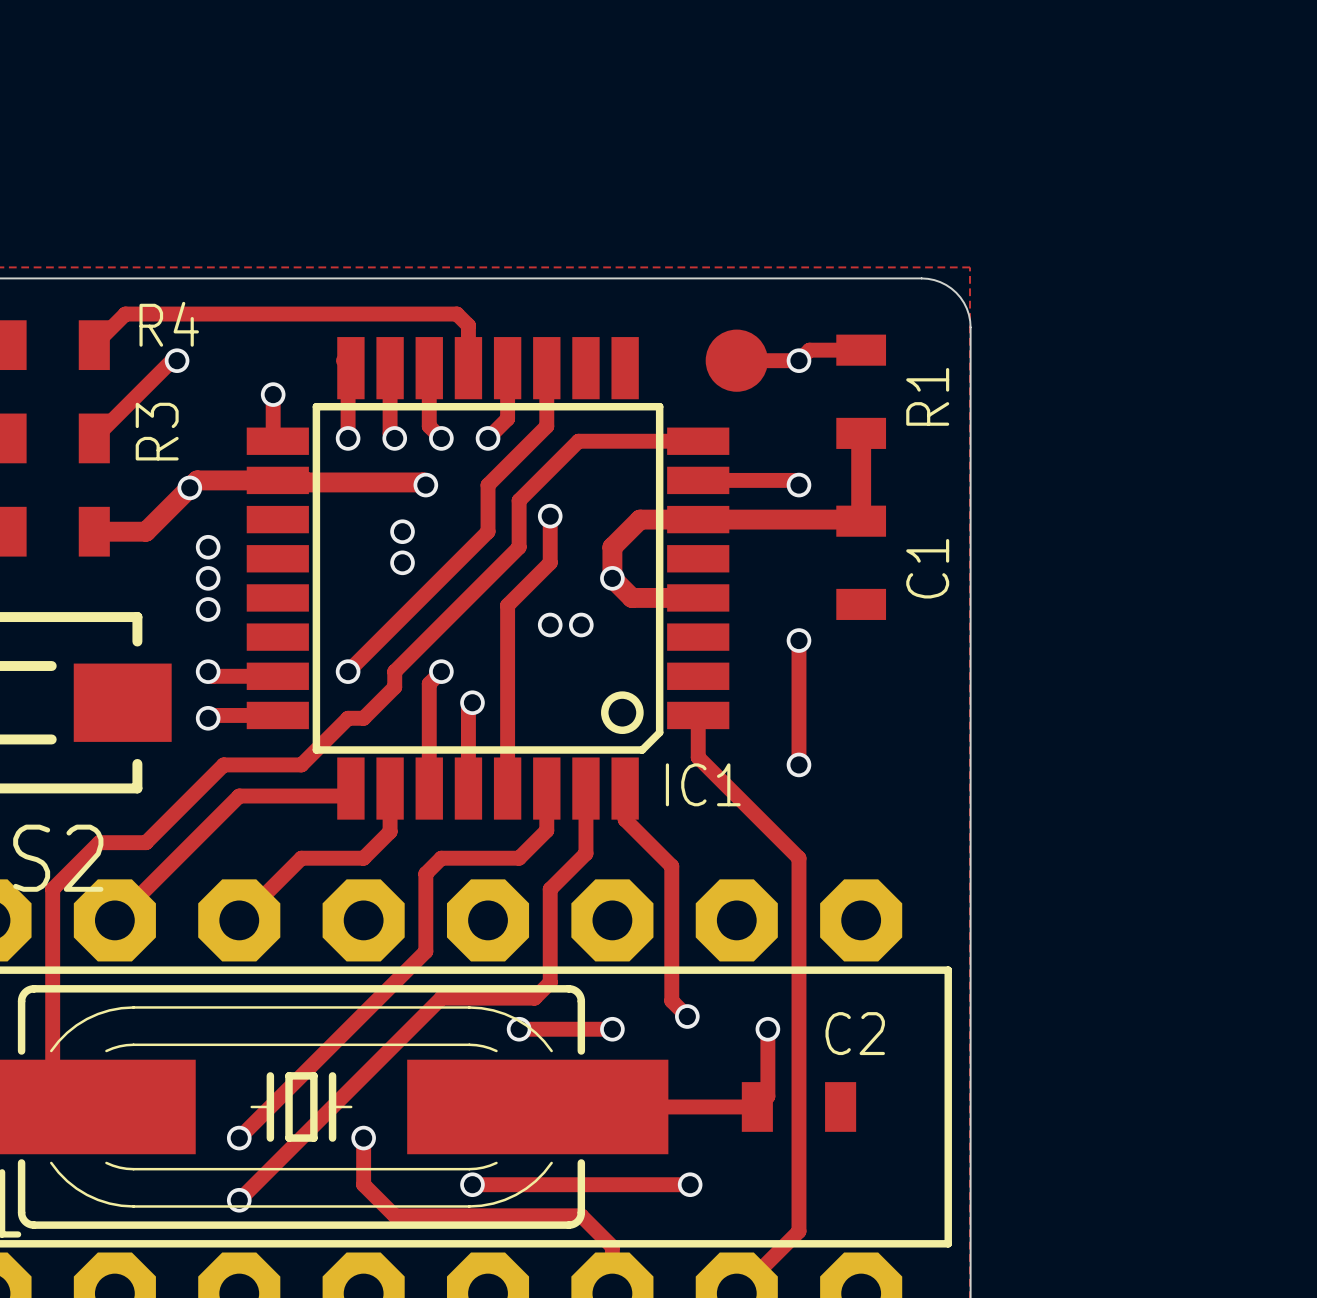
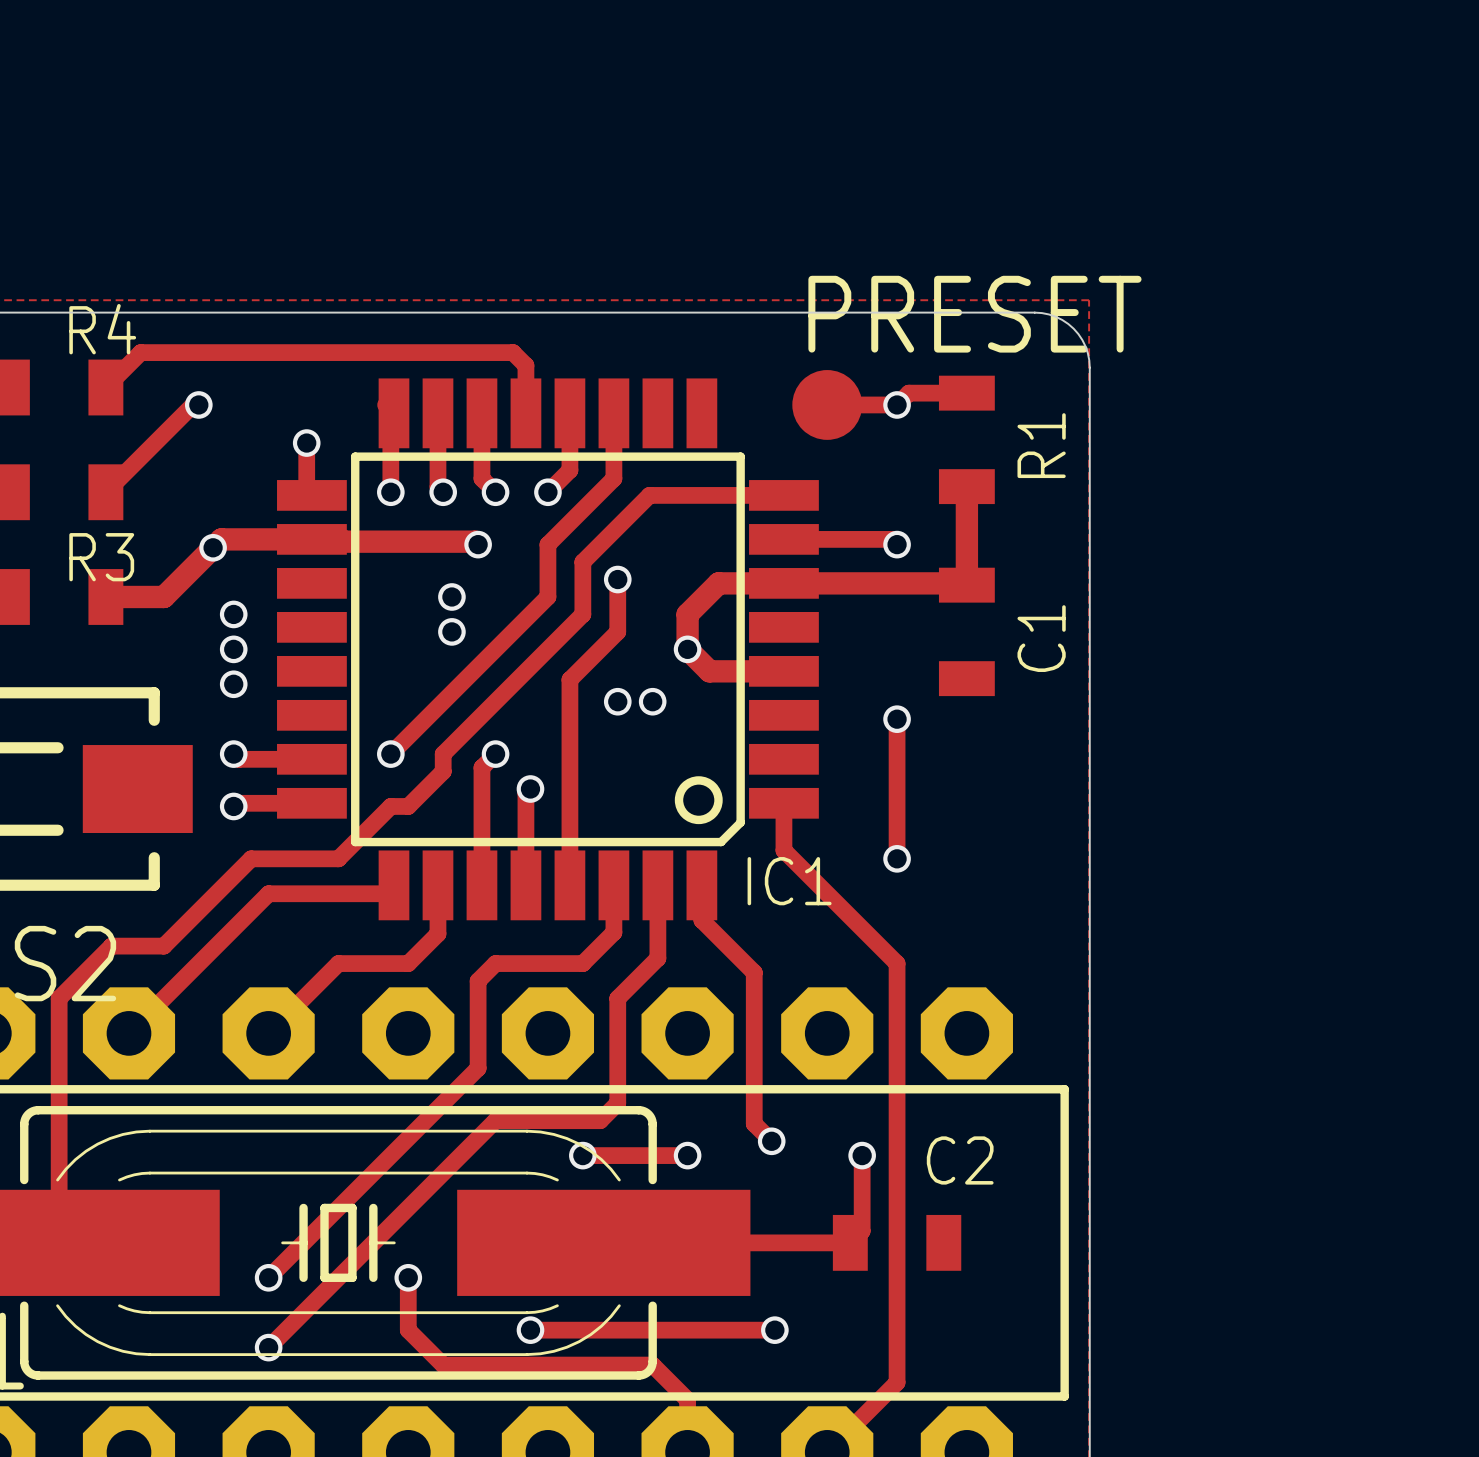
PRESET name: none -> PRESET (974, 314)
R4 name position: R4 (169, 324) -> R4 (102, 329)
R3 name rotation: 0° (157, 431) -> 90° clockwise (101, 557)
R3 name position: R3 (157, 431) -> R3 (101, 557)

